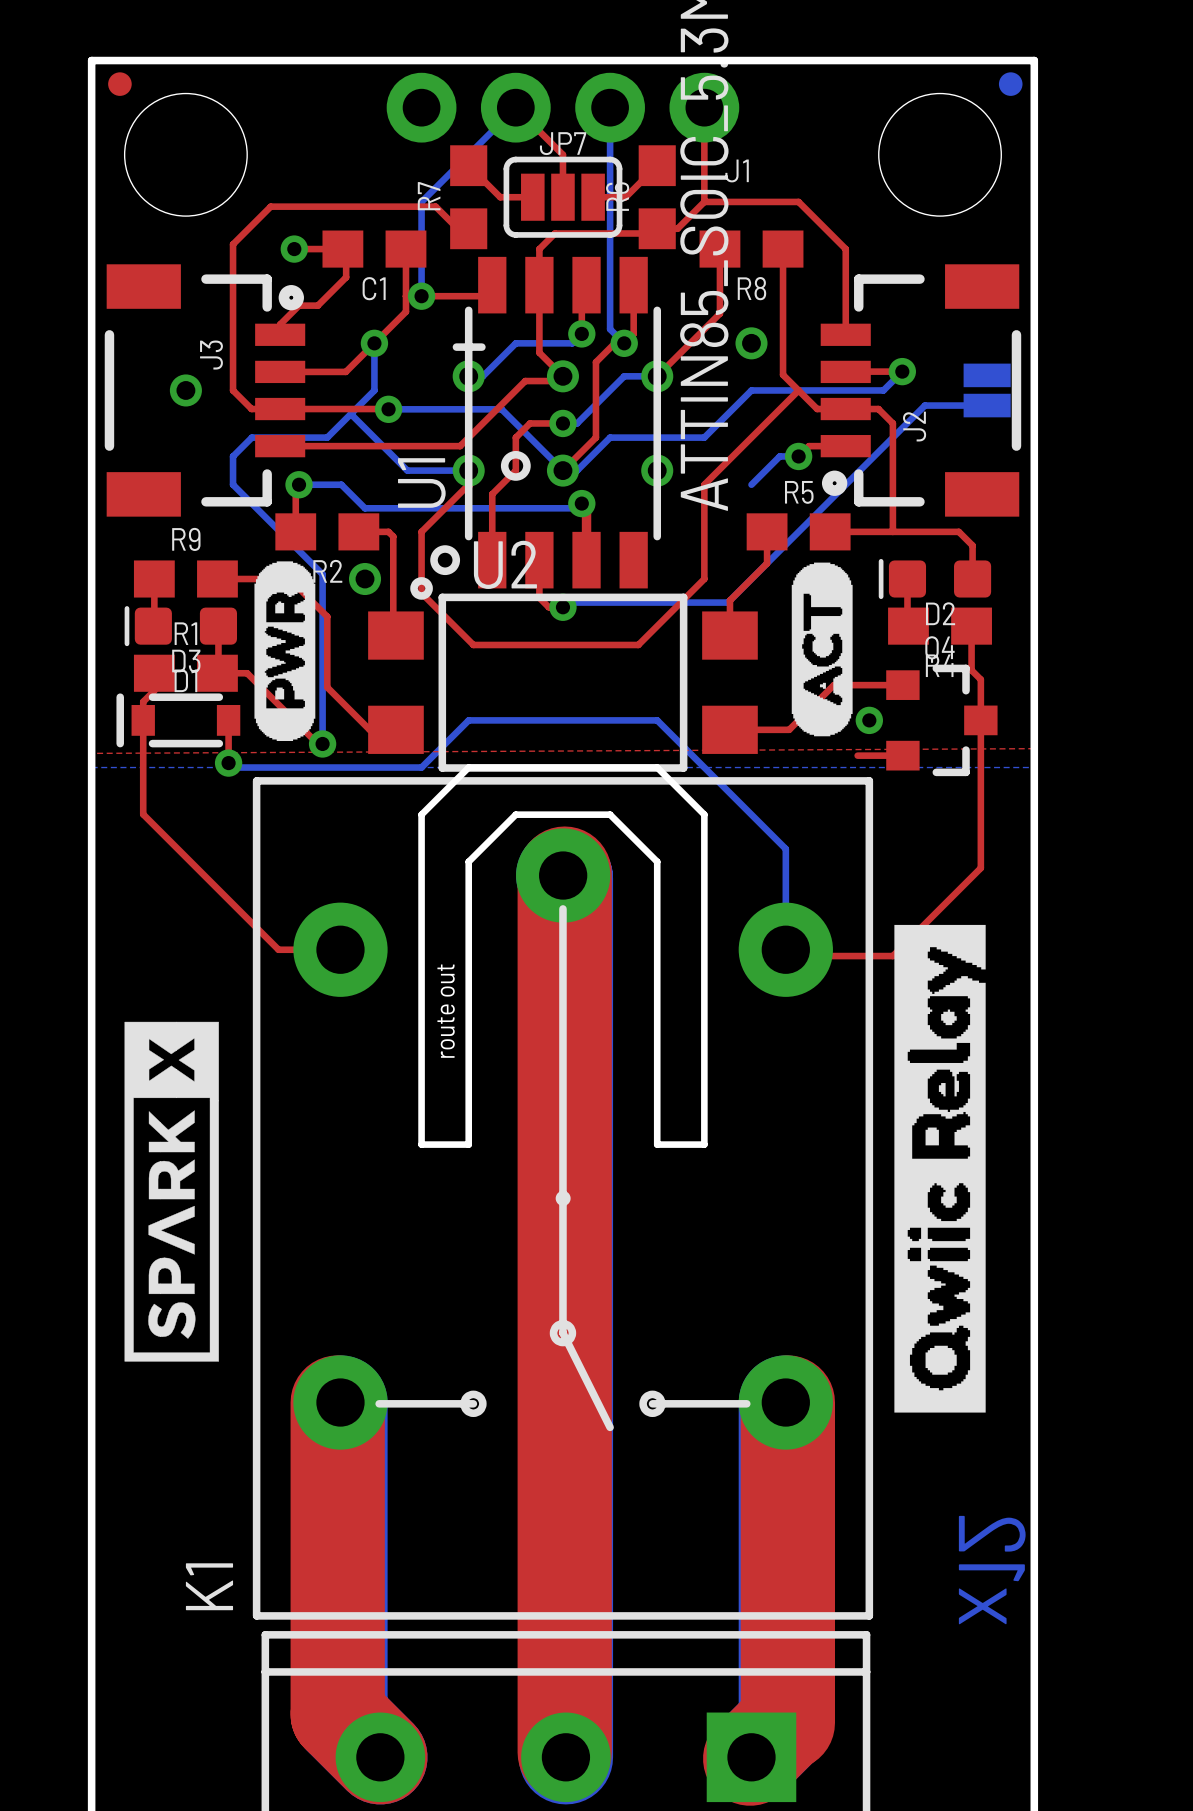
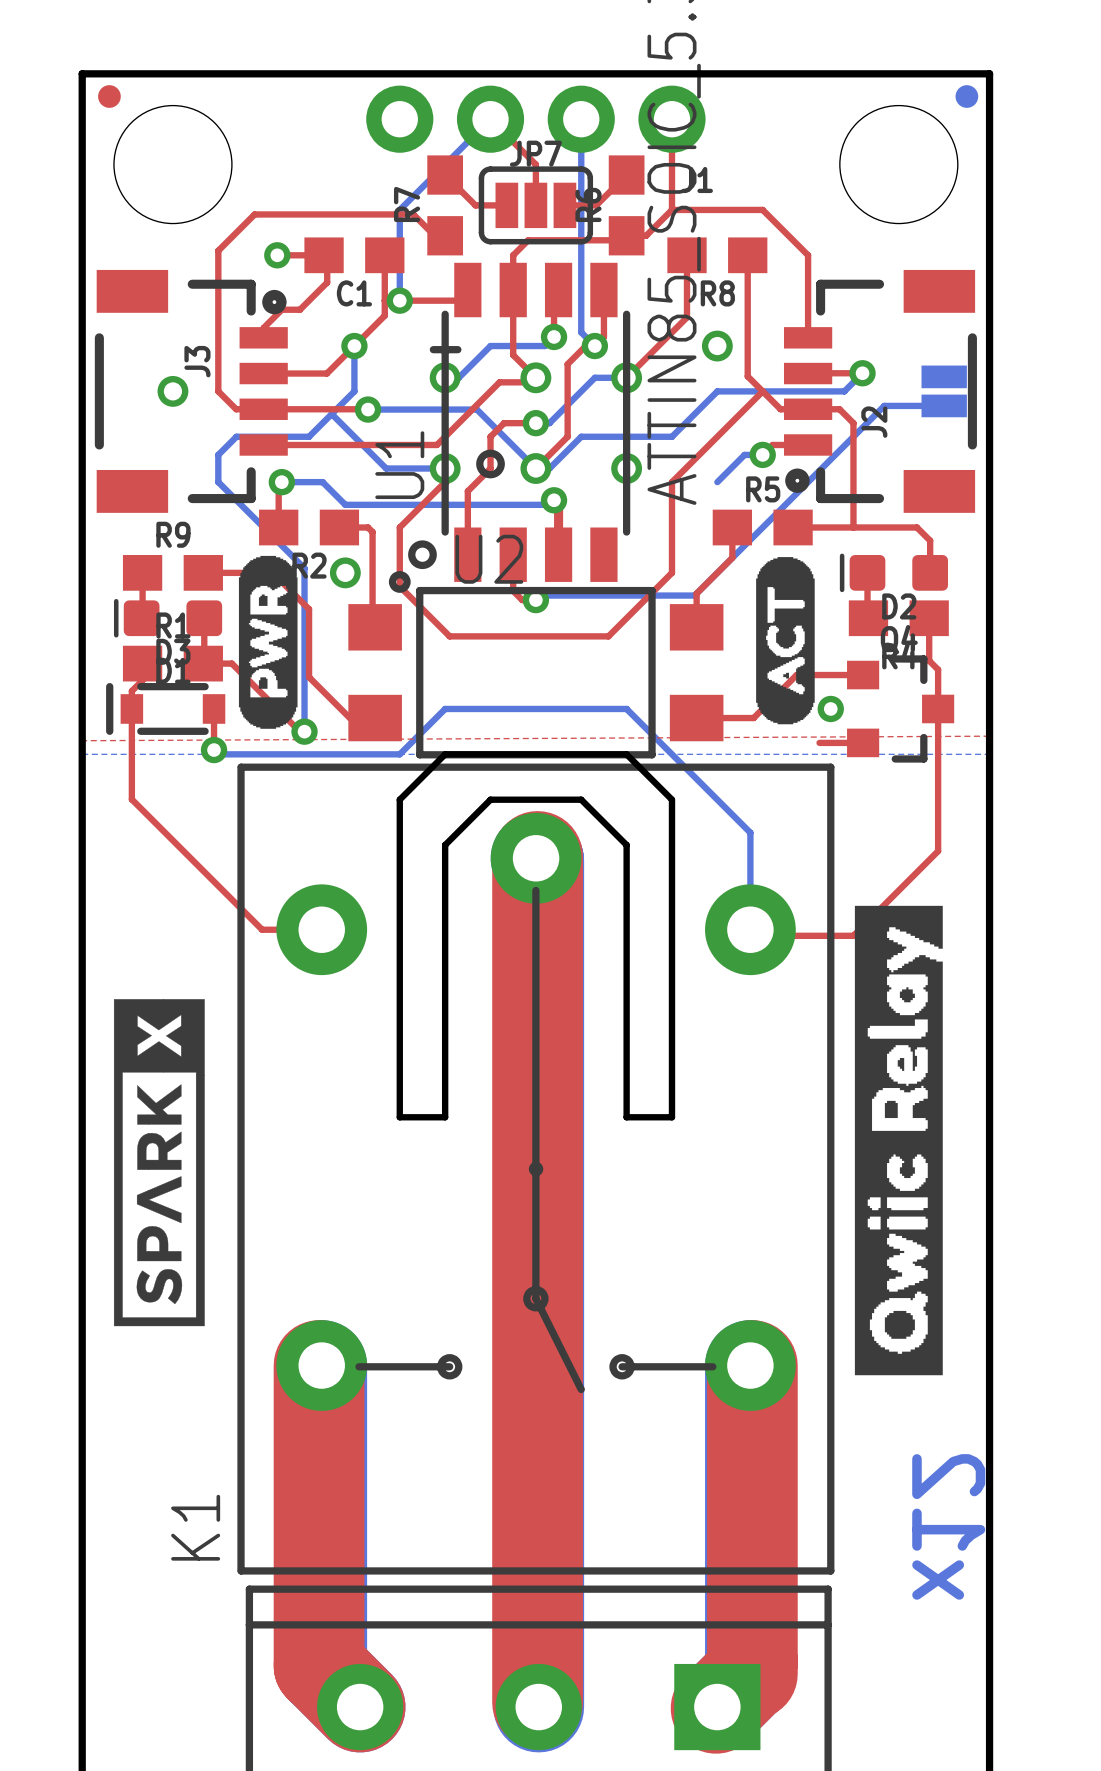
text: route out (446, 1011) -> none

